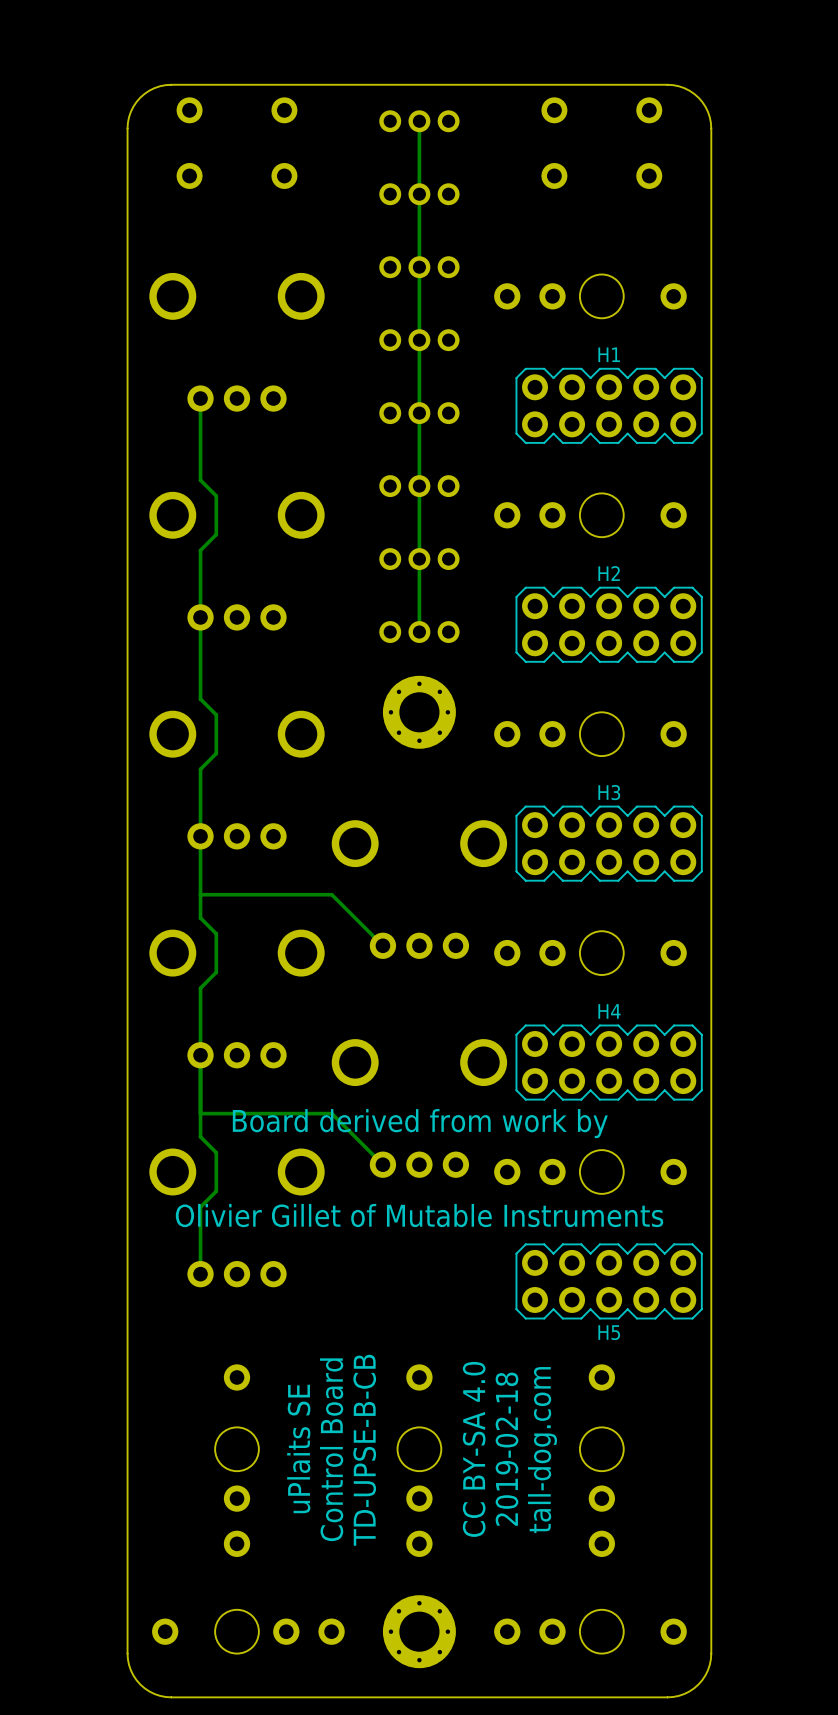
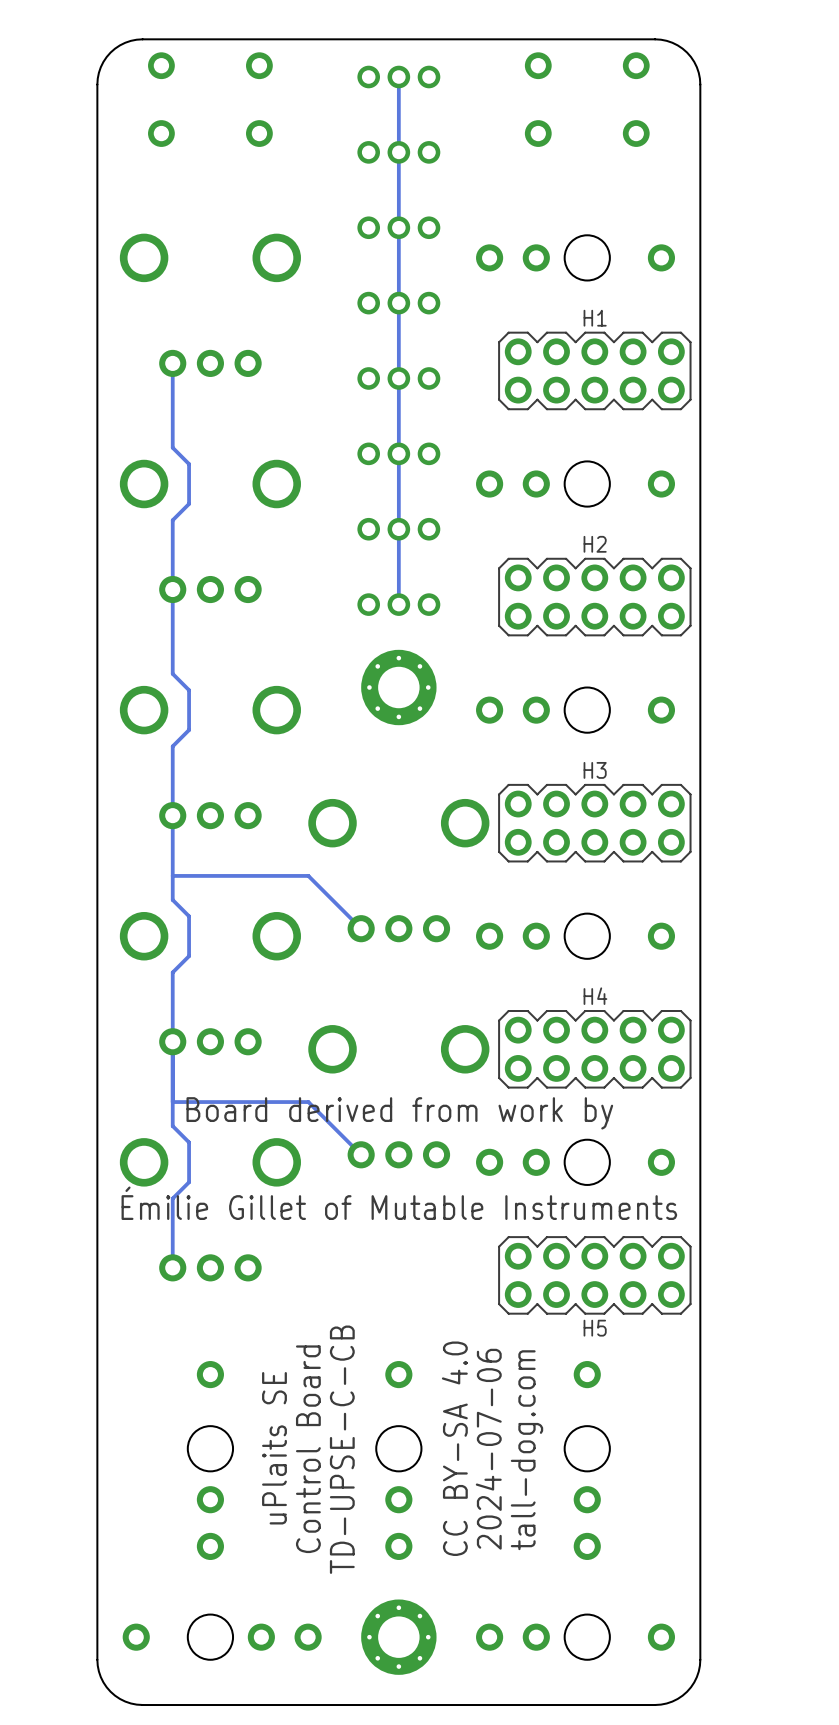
text: Olivier Gillet of Mutable Instruments (419, 1215) -> Émilie Gillet of Mutable Instruments (399, 1203)
text: 2019-02-18 (507, 1449) -> 2024-07-06 (488, 1449)
text: TD-UPSE-B-CB (364, 1450) -> TD-UPSE-C-CB (342, 1449)

